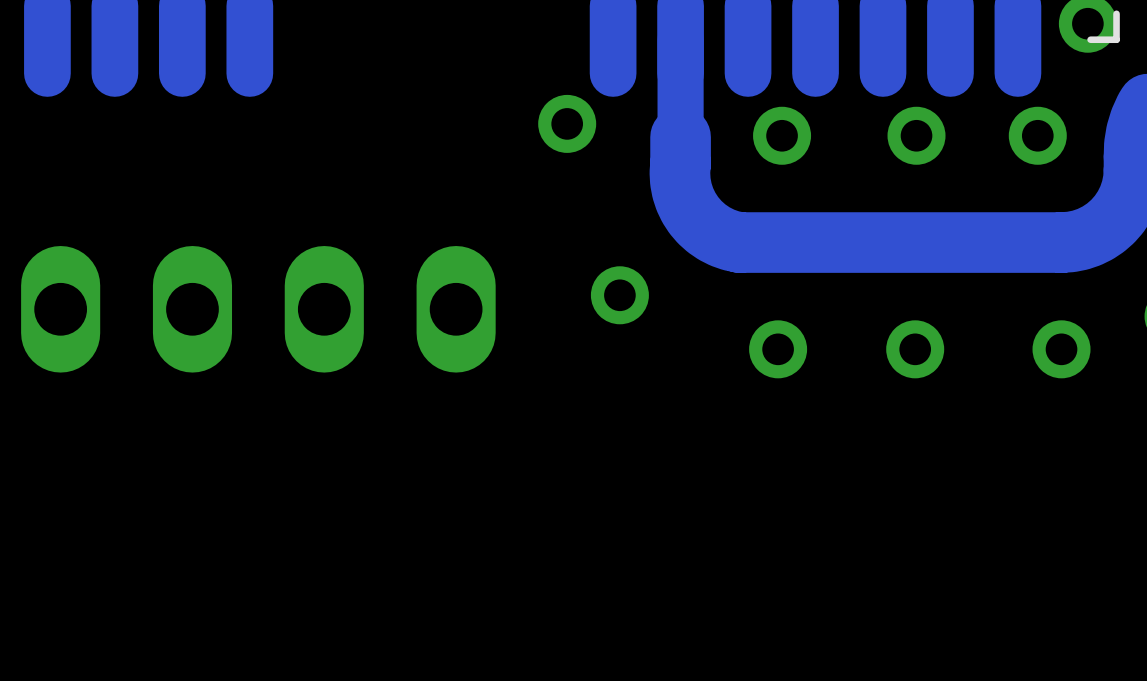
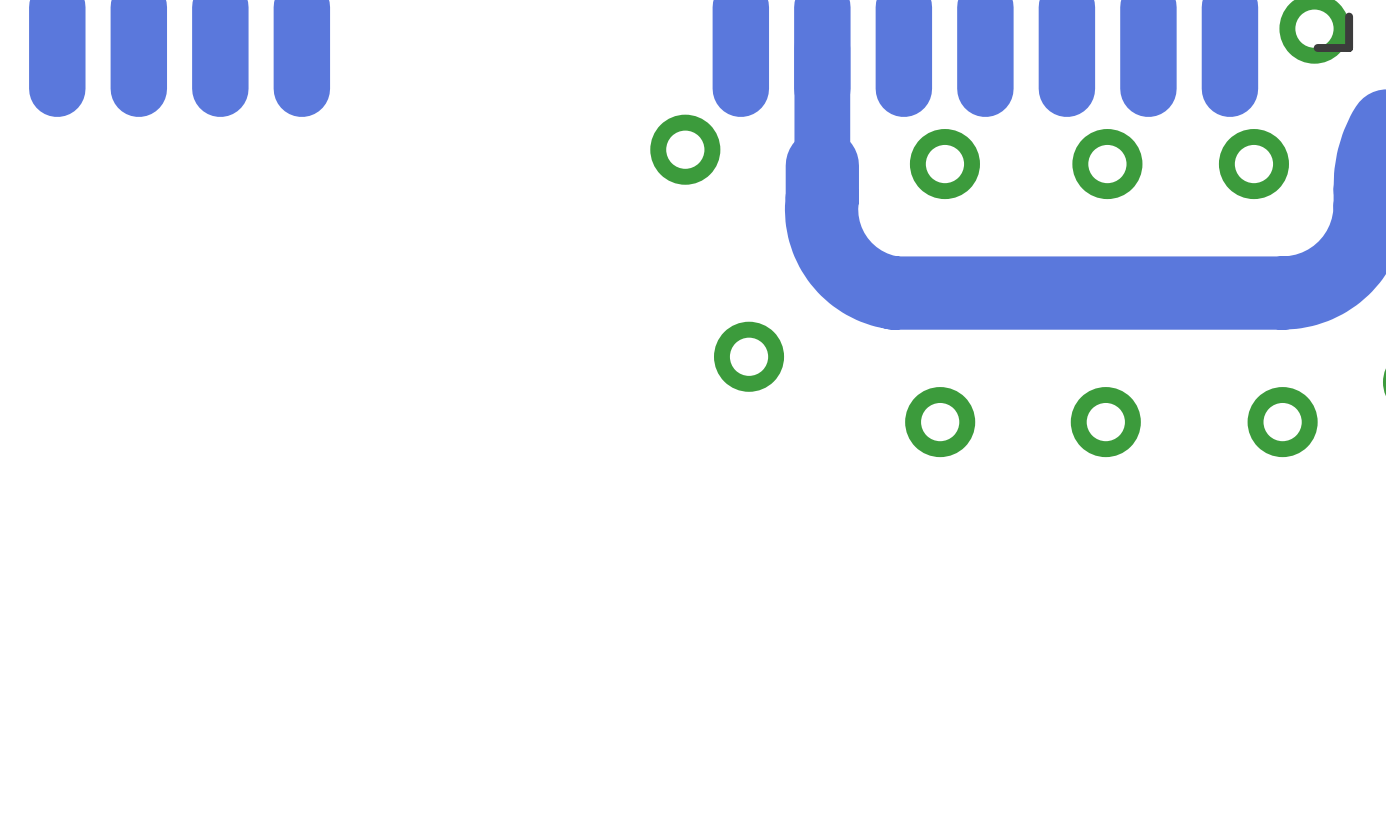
part: (258, 309) -> none

